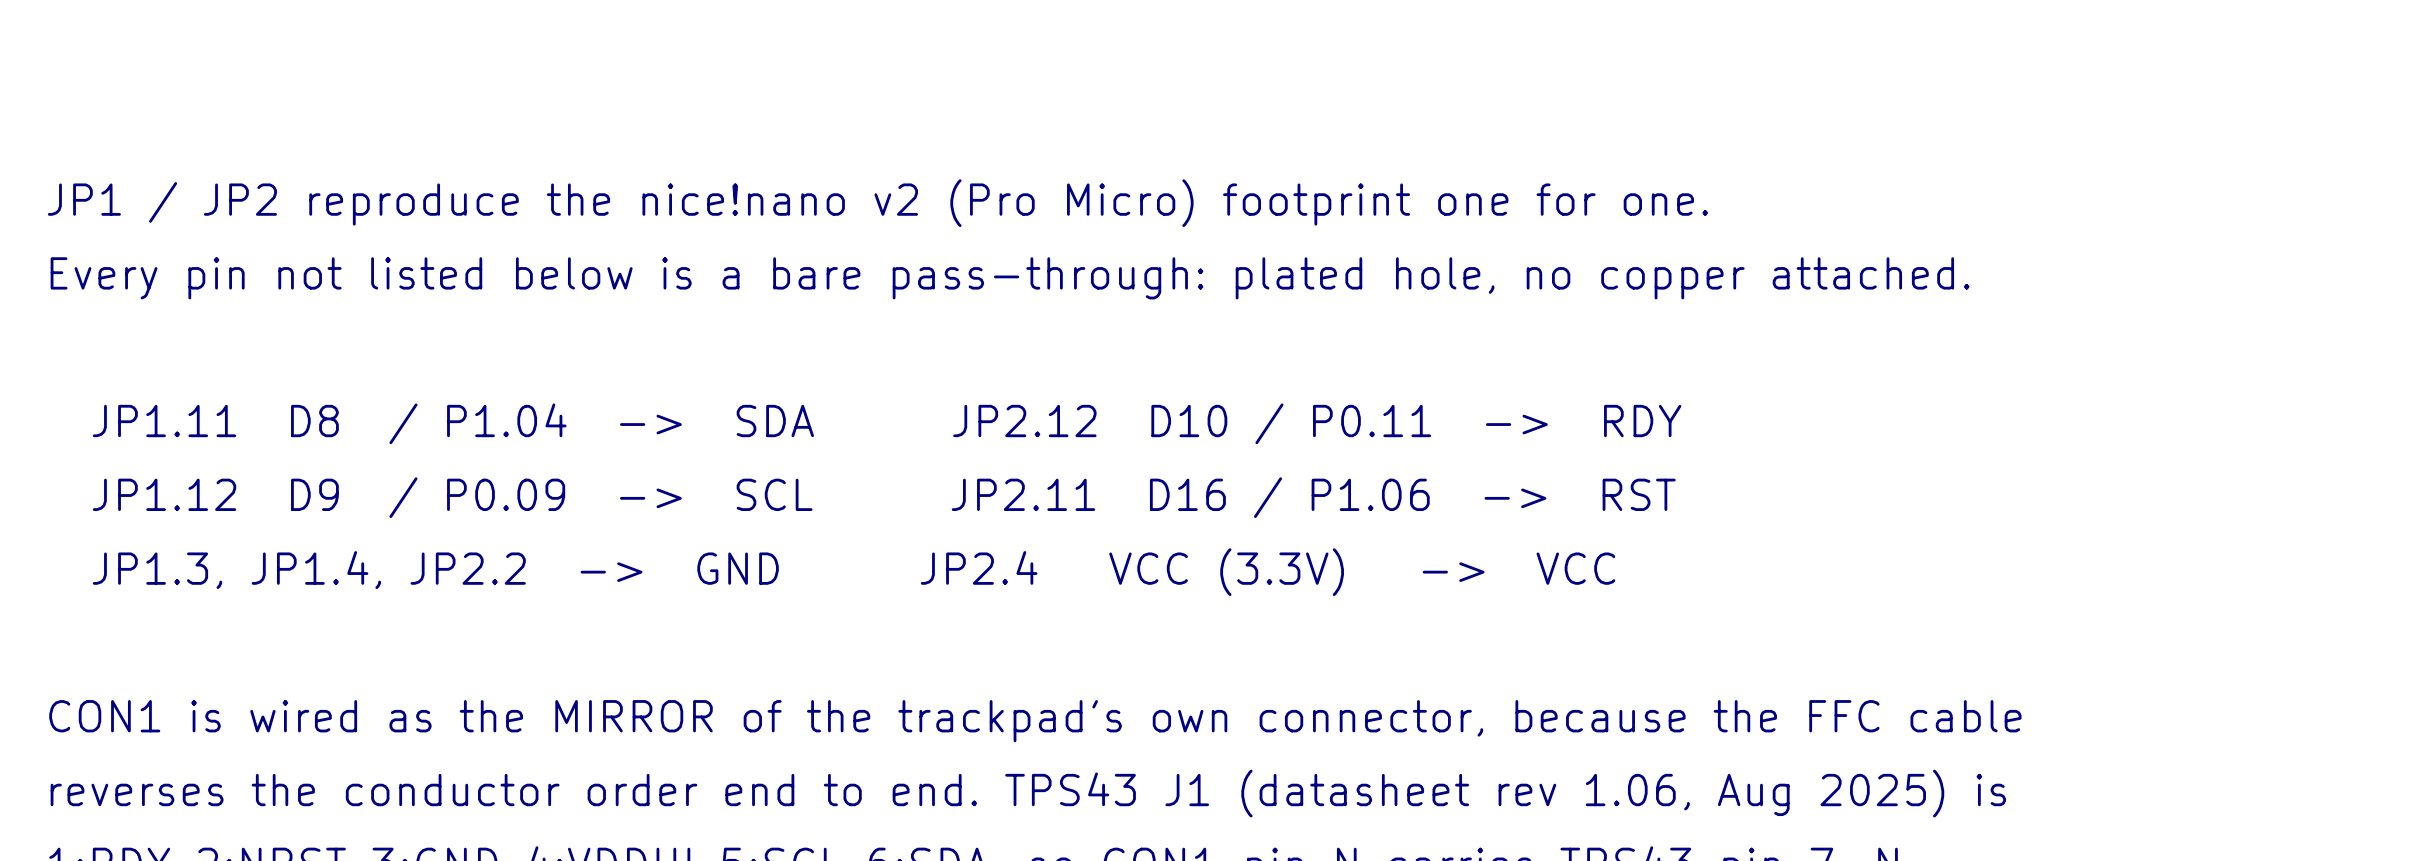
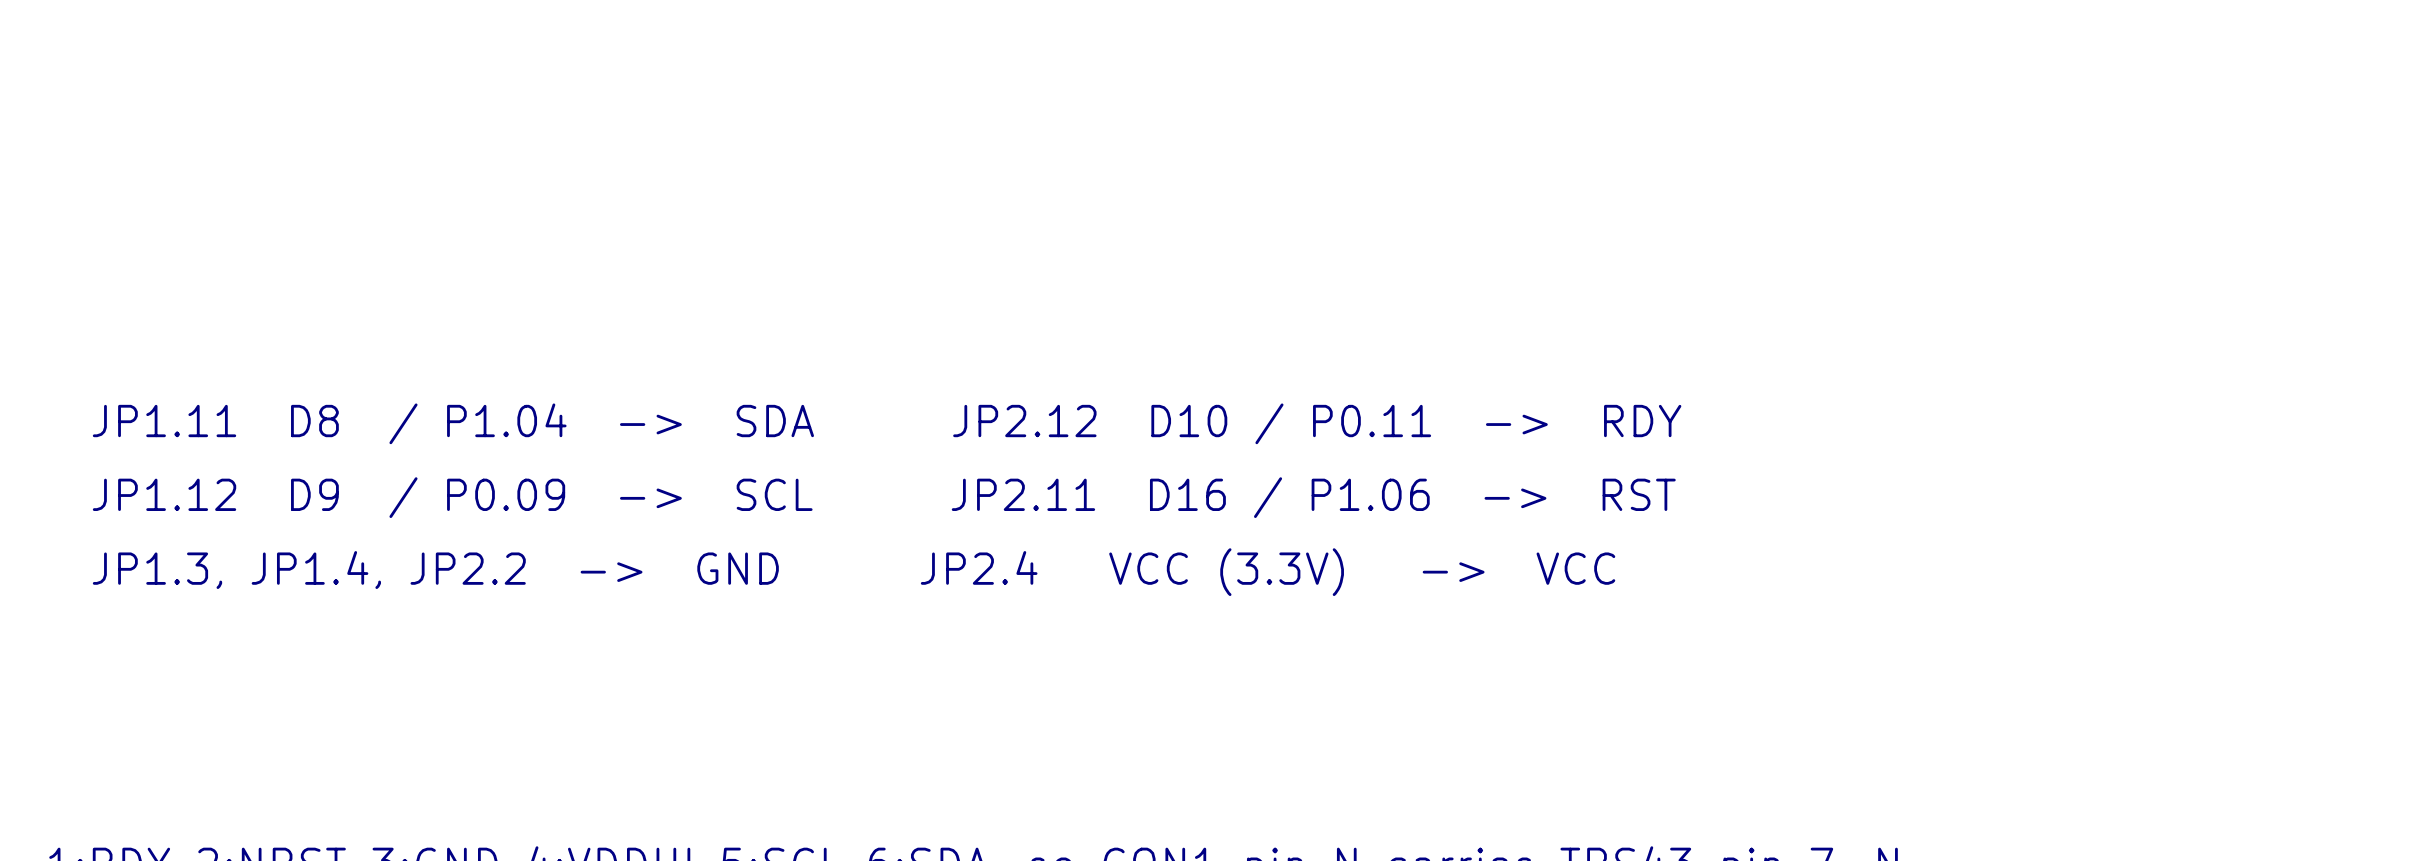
text: JP1 / JP2 reproduce the nice!nano v2 (Pro Micro) footprint one for one. (877, 203) -> none
text: Every pin not listed below is a bare pass-through: plated hole, no copper attached. (1010, 278) -> none
text: CON1 is wired as the MIRROR of the trackpad's own connector, because the FFC cable (1035, 721) -> none
text: reverses the conductor order end to end. TPS43 J1 (datasheet rev 1.06, Aug 2025) is (1028, 793) -> none

